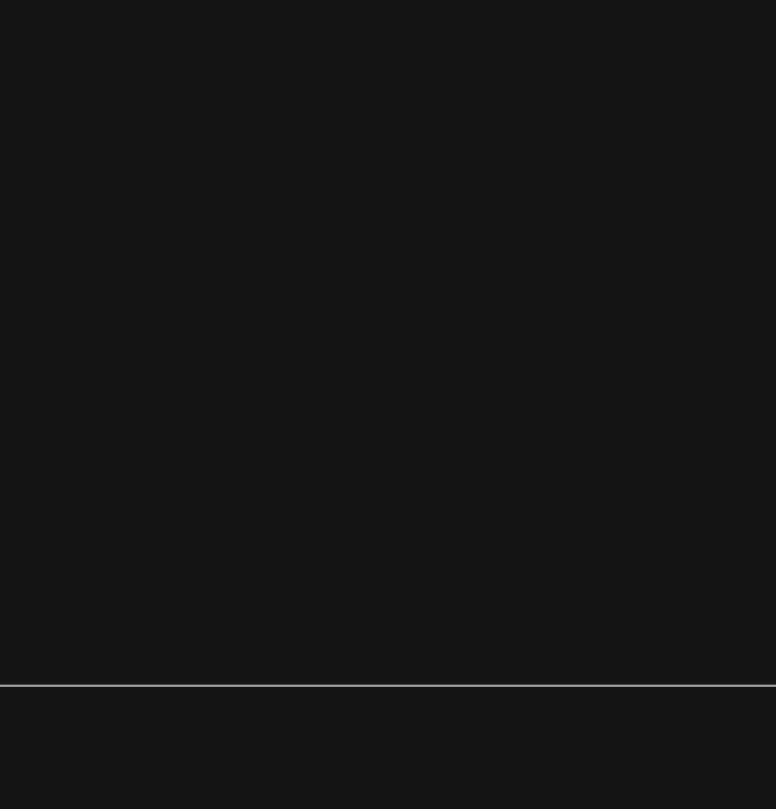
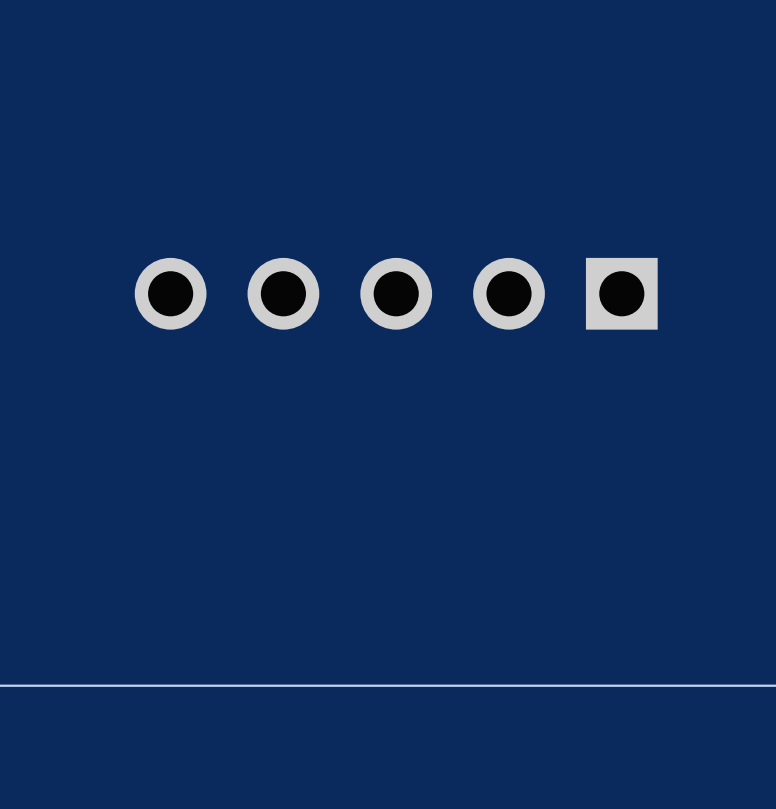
part: none -> (396, 293)

